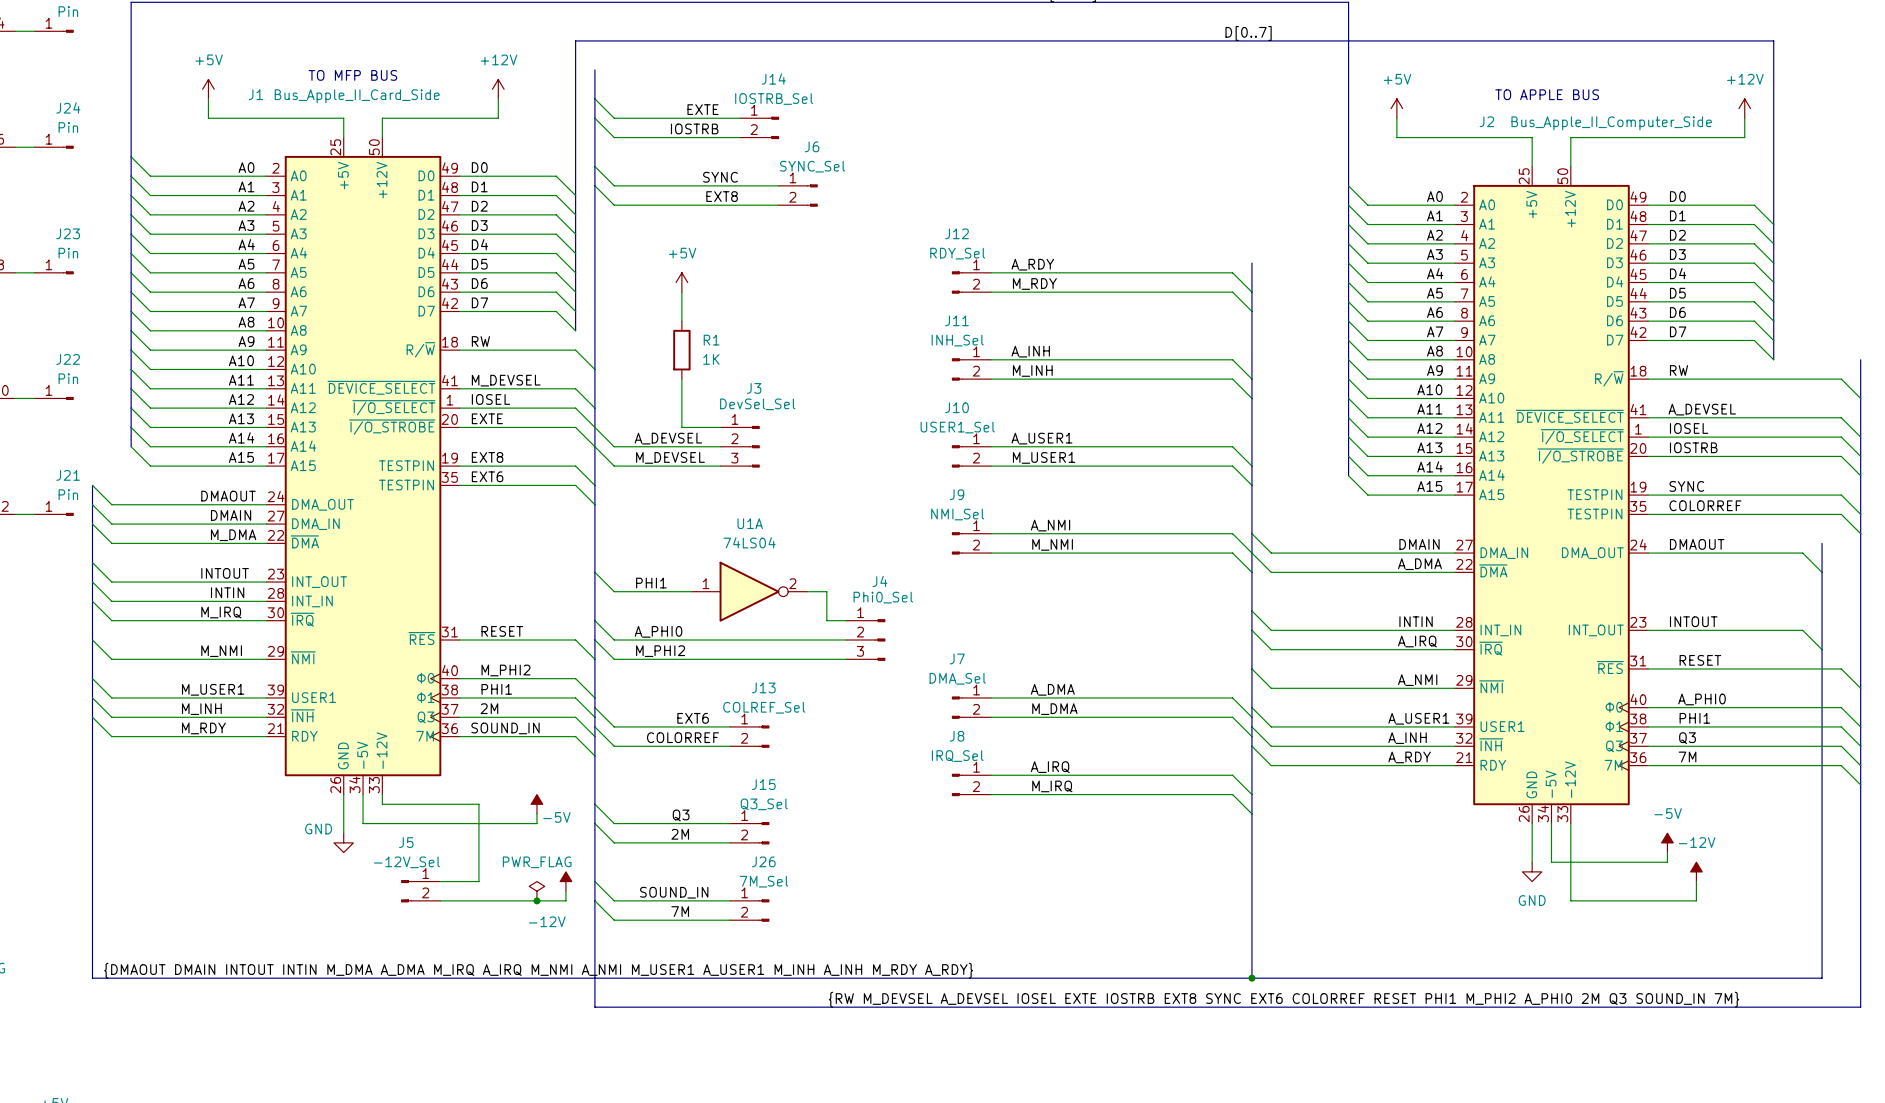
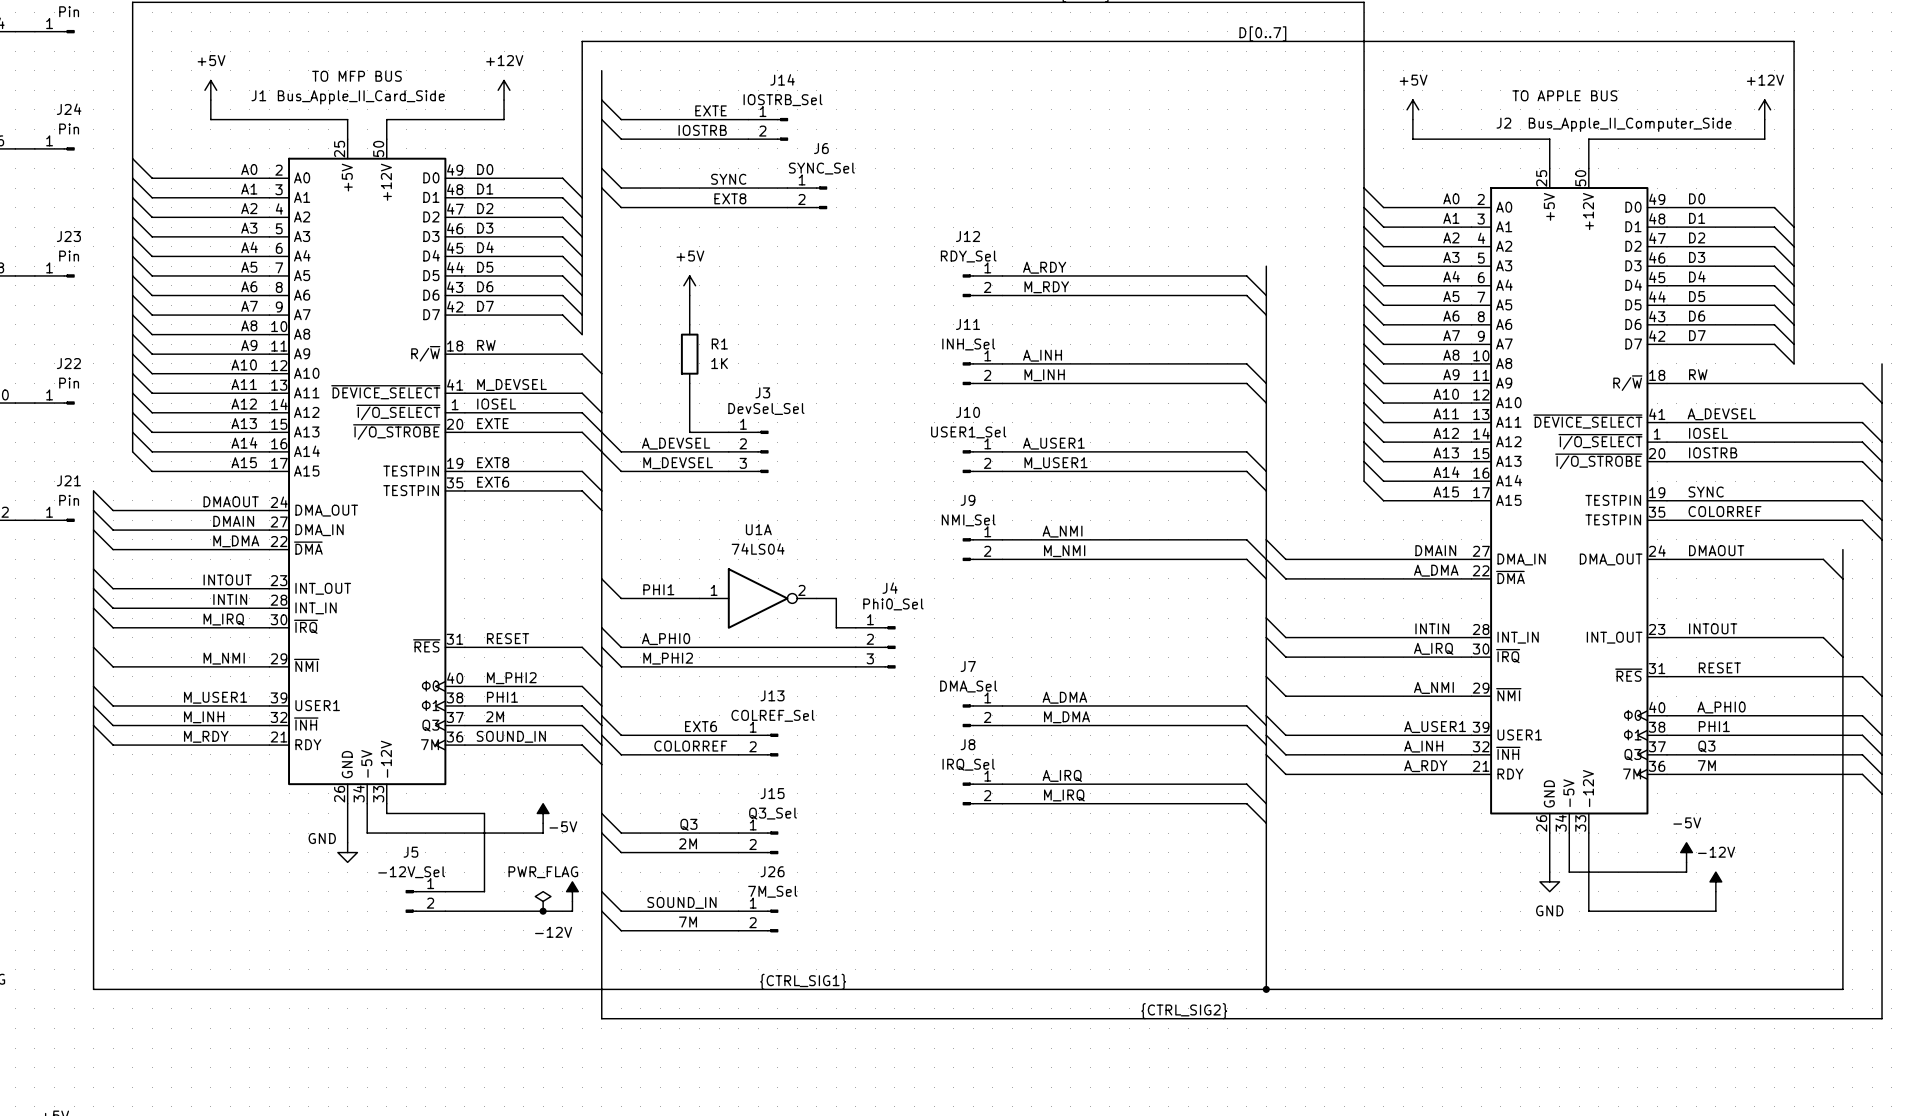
label: {DMAOUT DMAIN INTOUT INTIN M_DMA A_DMA M_IRQ A_IRQ M_NMI A_NMI M_USER1 A_USER1 M_INH A_INH M_RDY A_RDY} (538, 970) -> none
label: none -> {CTRL_SIG1} (803, 981)
label: none -> {CTRL_SIG2} (1184, 1011)
label: {RW M_DEVSEL A_DEVSEL IOSEL EXTE IOSTRB EXT8 SYNC EXT6 COLORREF RESET PHI1 M_PHI2 A_PHI0 2M Q3 SOUND_IN 7M} (1284, 999) -> none

